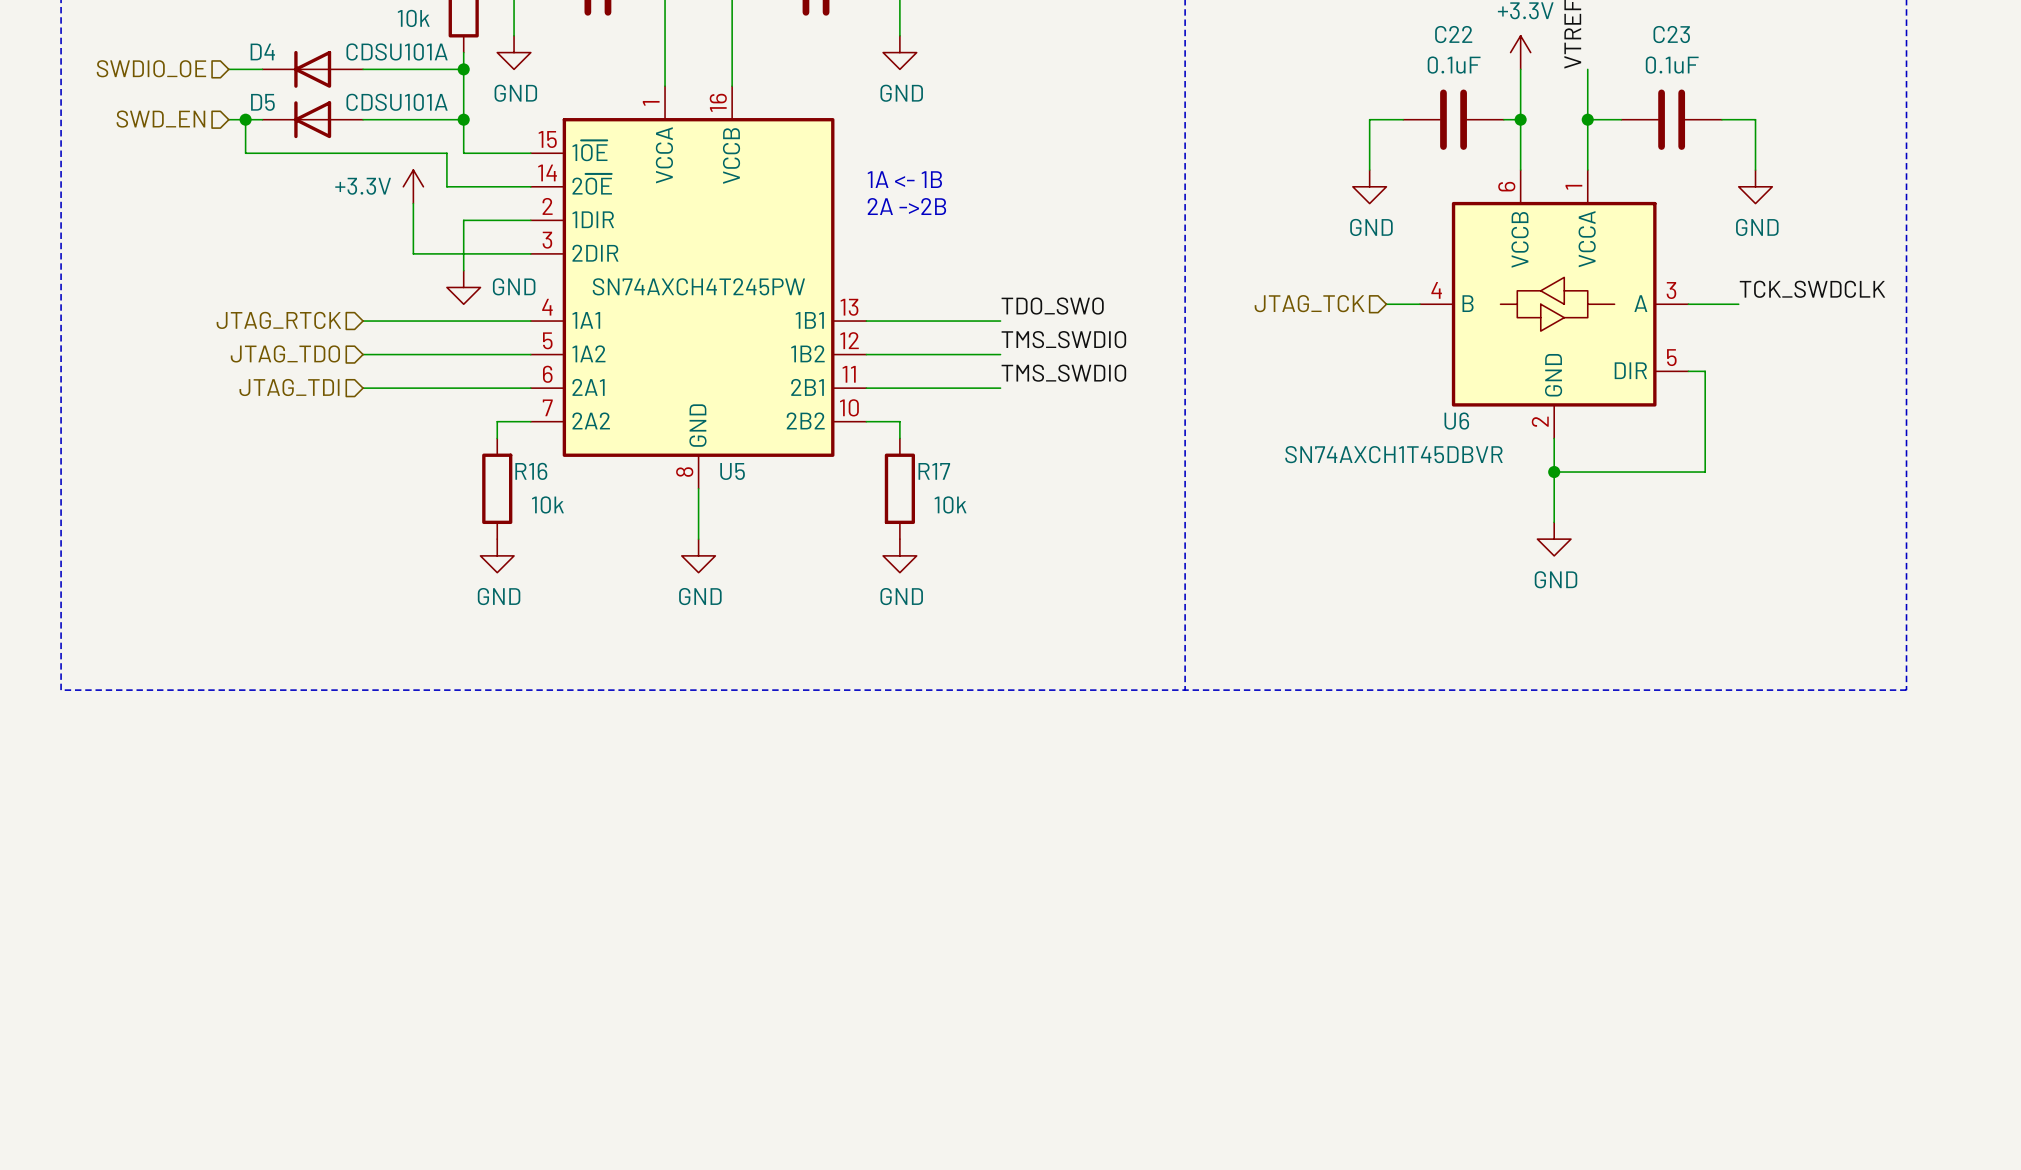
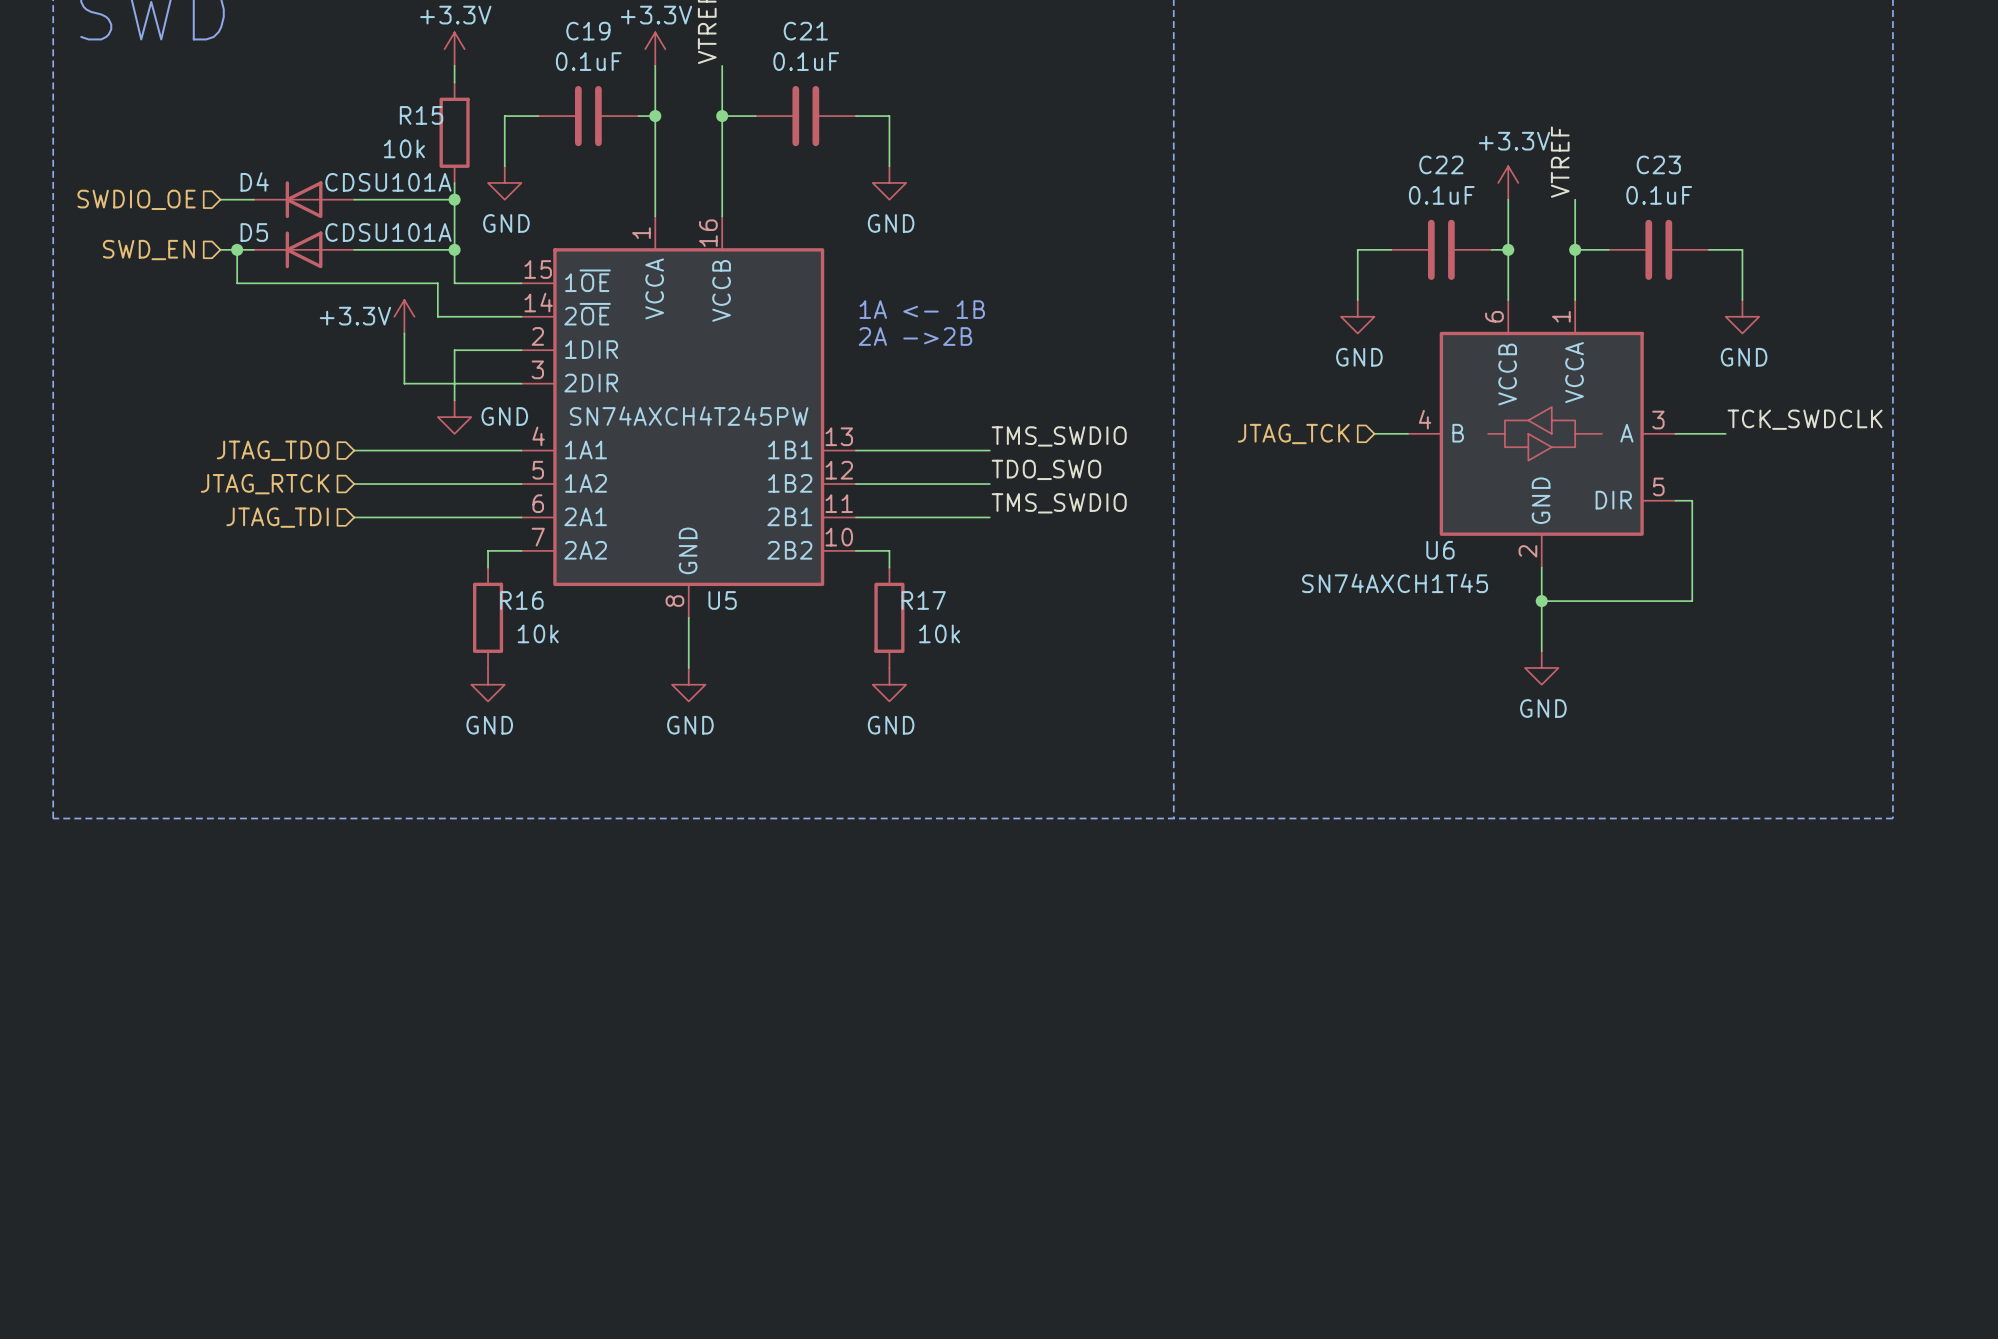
label: TDO_SWO (1052, 306) -> TMS_SWDIO (1059, 436)
hierarchical label: JTAG_RTCK (278, 320) -> JTAG_TDO (273, 450)
label: TMS_SWDIO (1063, 339) -> TDO_SWO (1046, 469)
hierarchical label: JTAG_TDO (285, 353) -> JTAG_RTCK (265, 484)
U6 value: SN74AXCH1T45DBVR (1394, 454) -> SN74AXCH1T45 (1395, 583)

